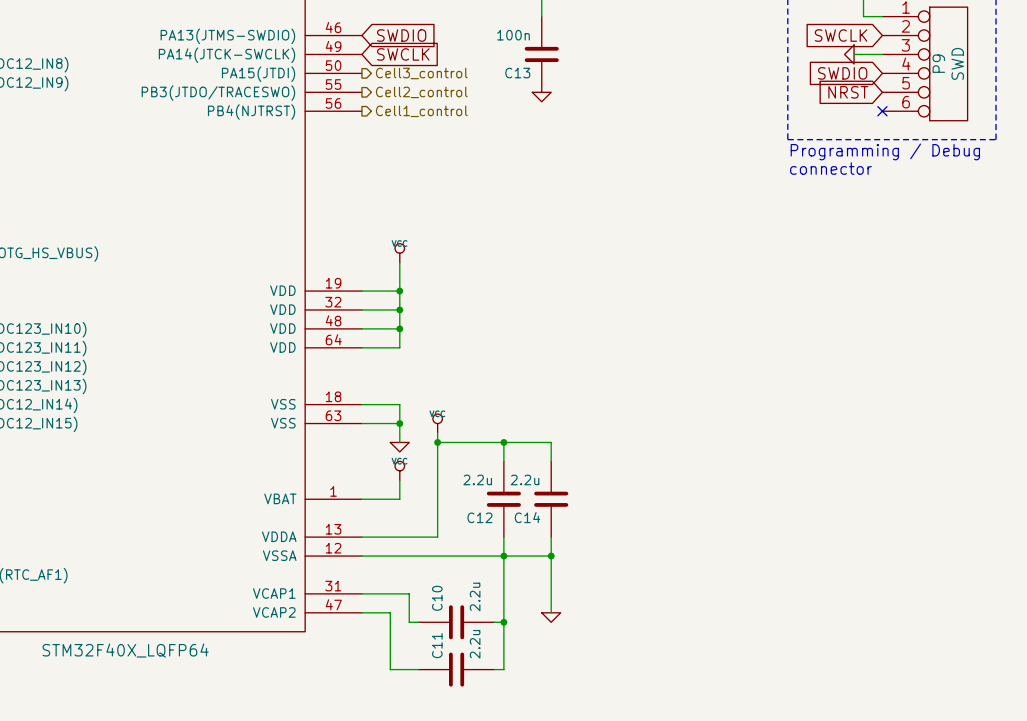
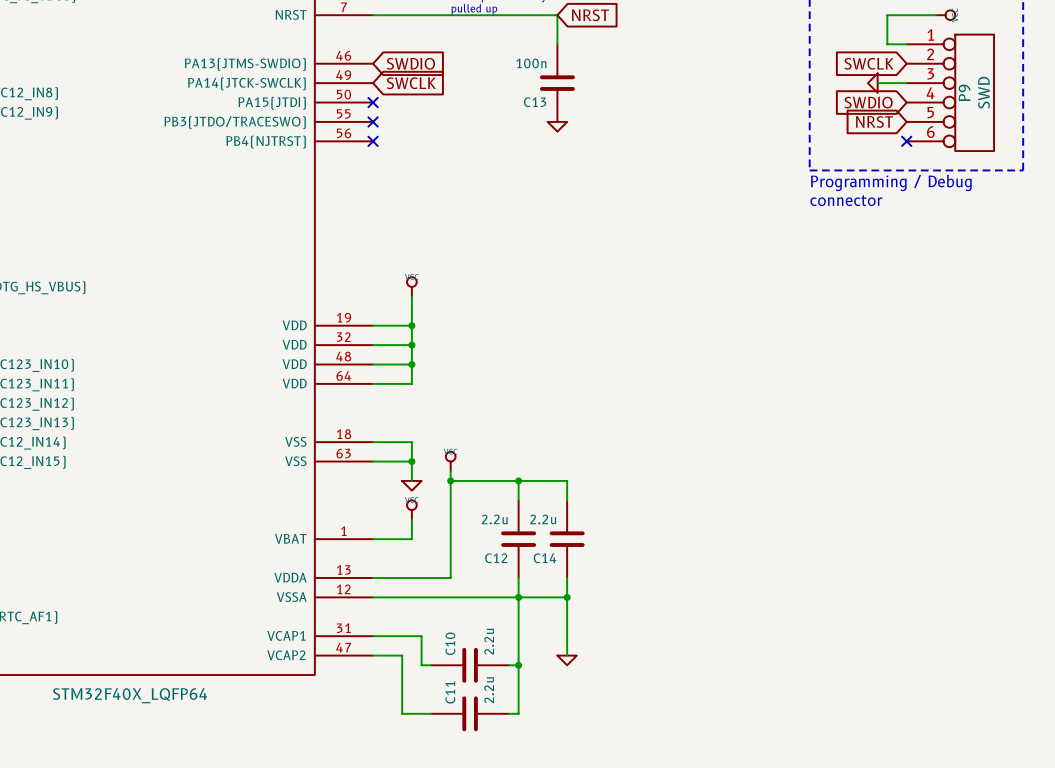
no-connect mark: none -> (373, 102)
hierarchical label: Cell3_control (421, 73) -> none
no-connect mark: none -> (373, 121)
hierarchical label: Cell2_control (421, 92) -> none
no-connect mark: none -> (373, 141)
hierarchical label: Cell1_control (421, 111) -> none

